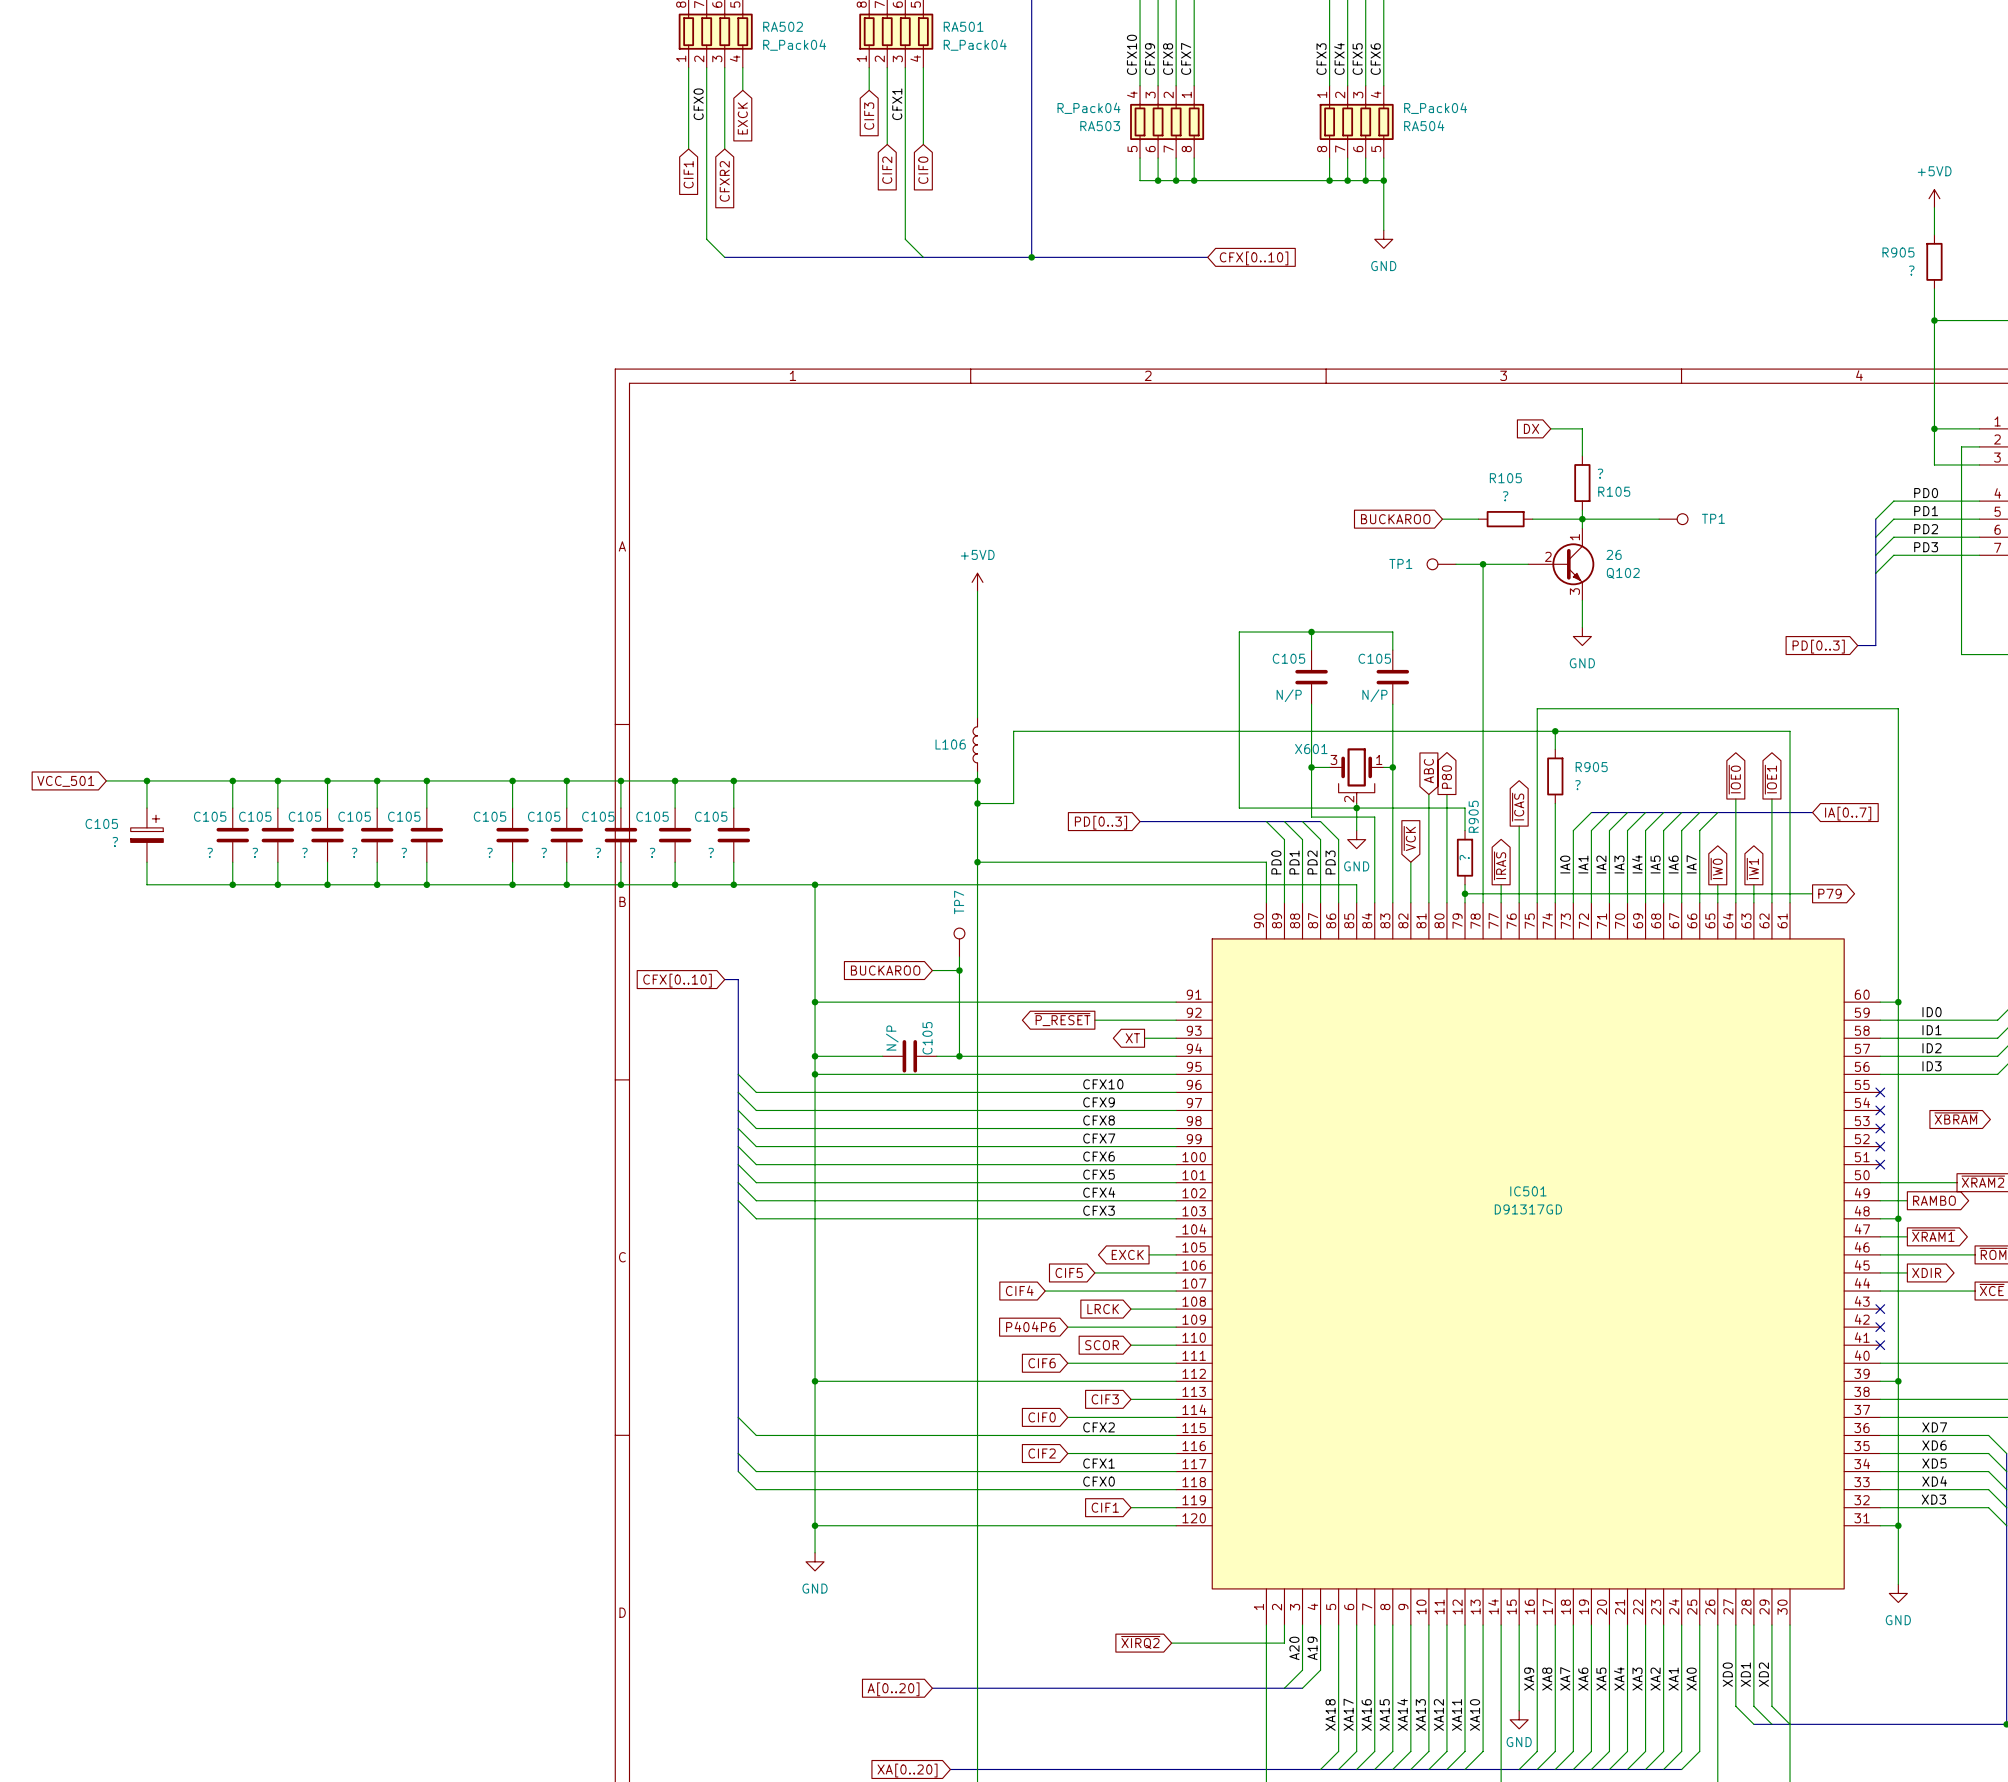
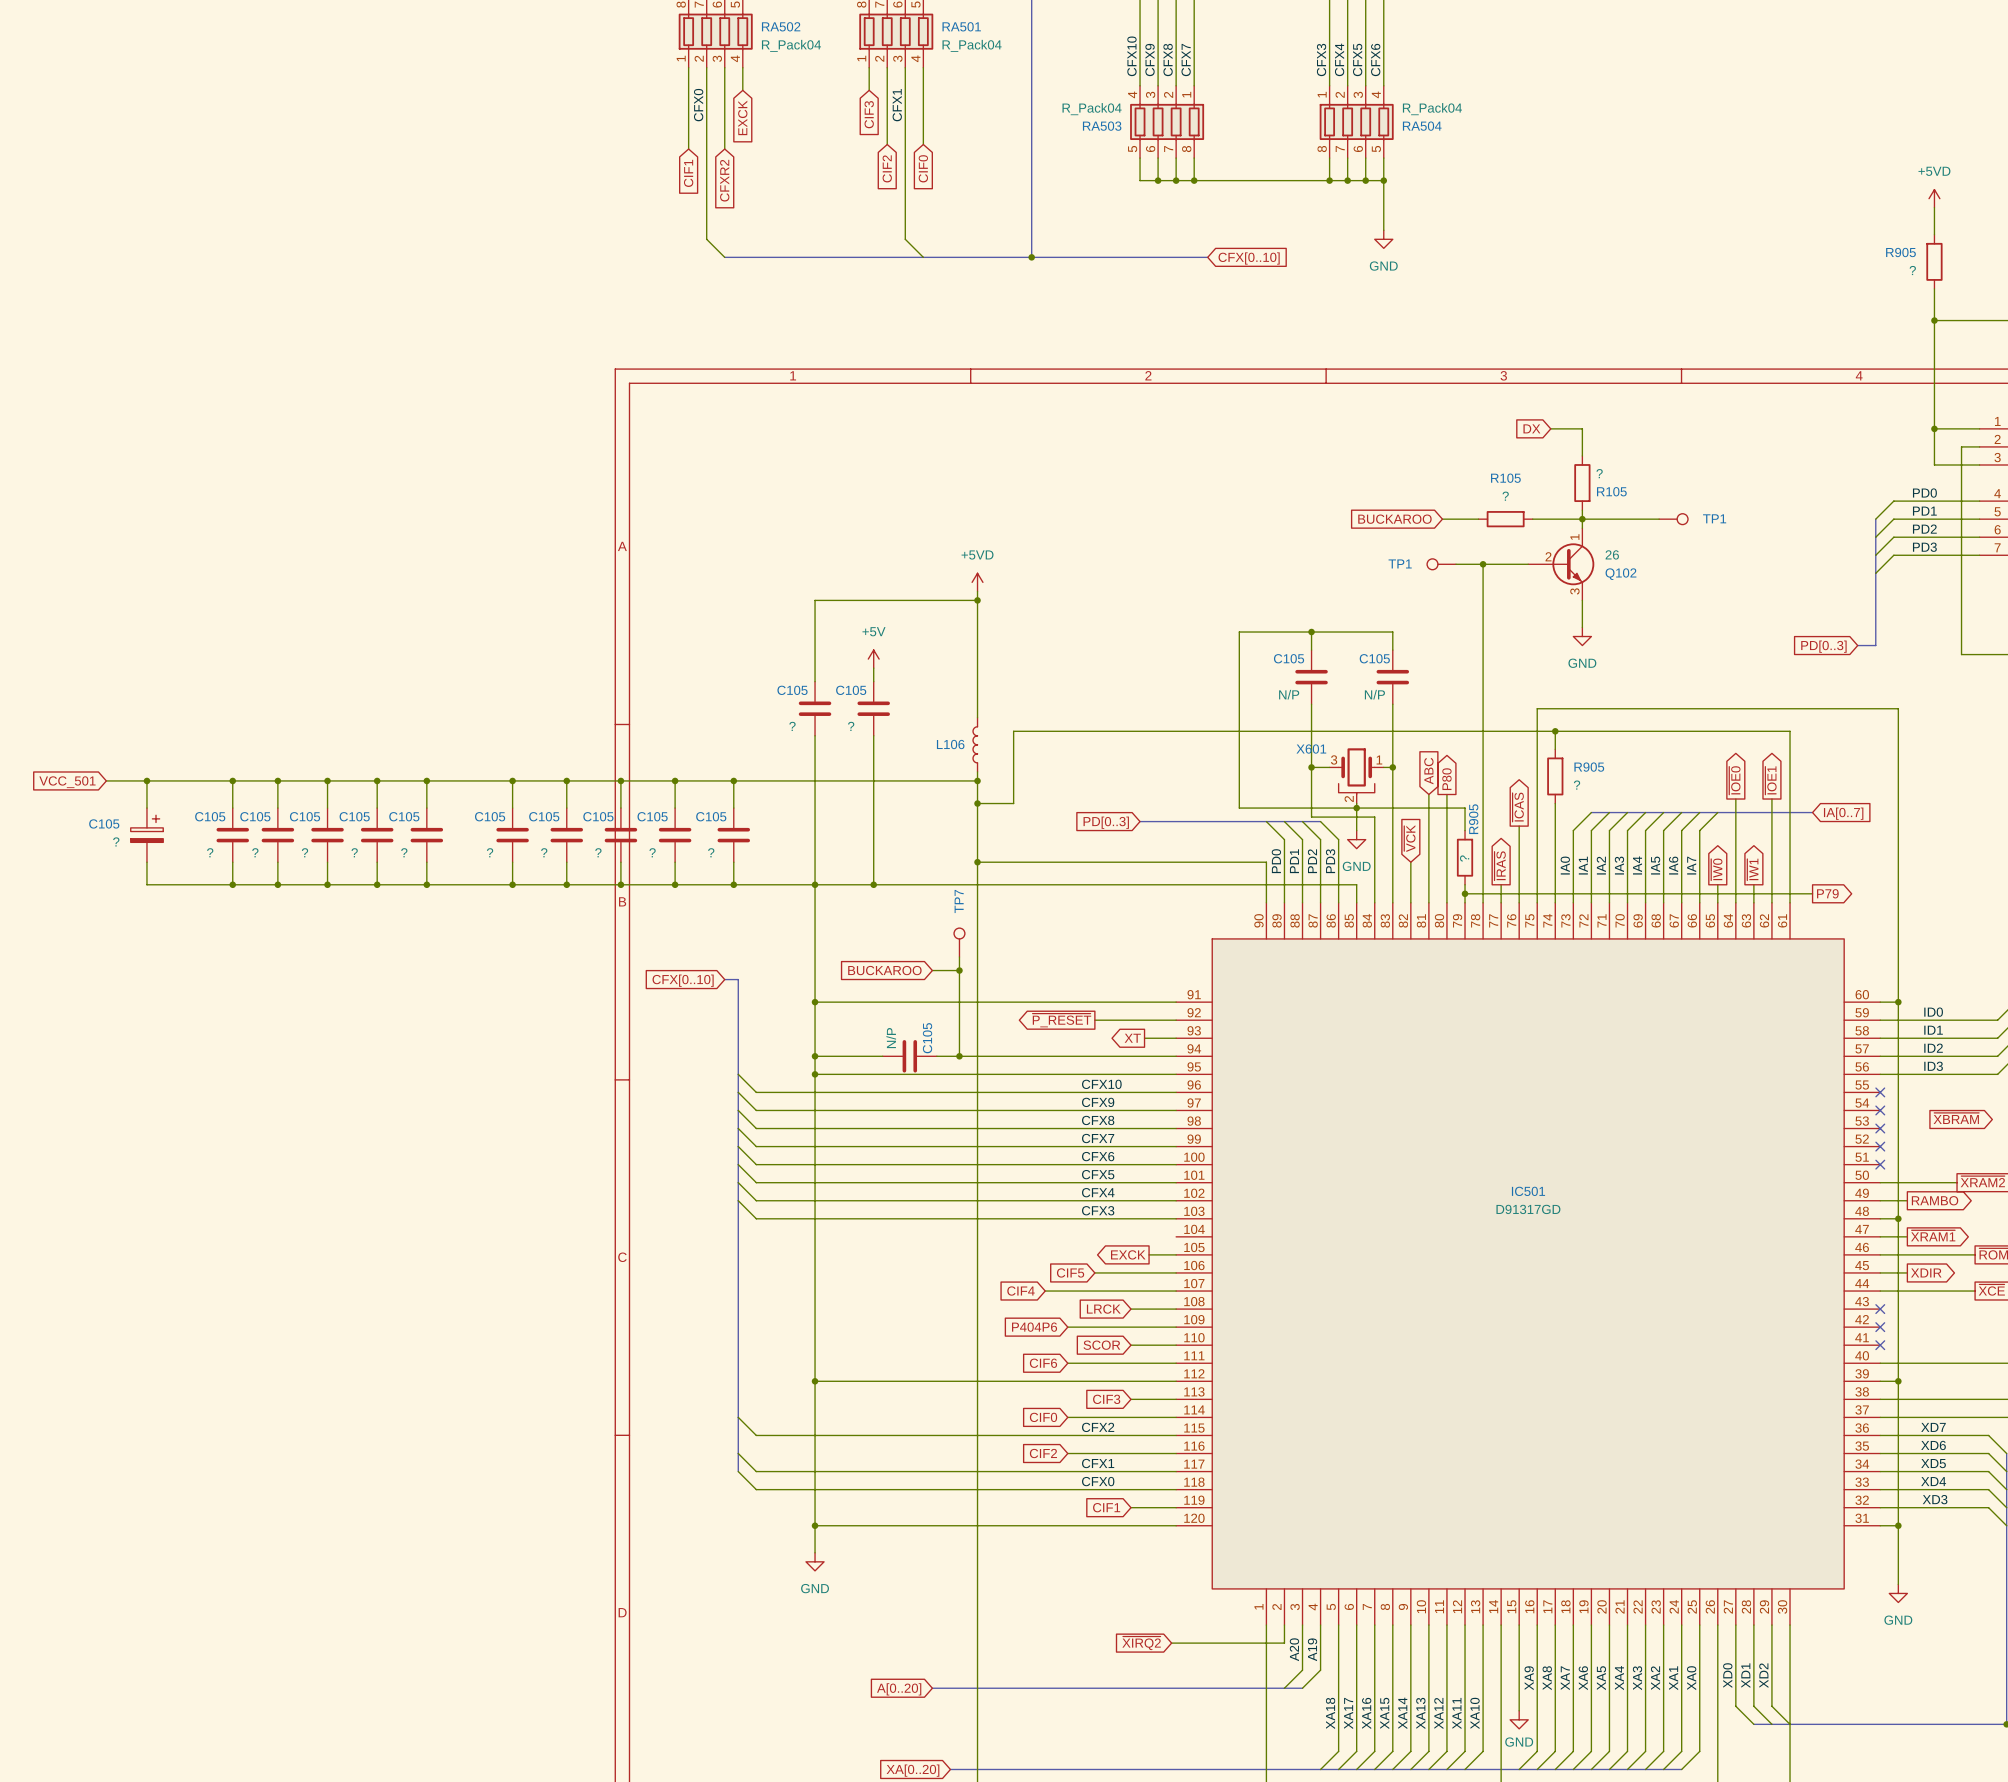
wire: none -> (977, 600) (815, 600) (815, 681)
junction: none -> (977, 600)
power symbol: none -> +5V (873, 659)
wire: none -> (873, 668) (873, 681)
C105: none -> ? (815, 708)
C105: none -> ? (873, 708)
wire: none -> (815, 735) (815, 884)
wire: none -> (873, 735) (873, 884)
junction: none -> (873, 884)

